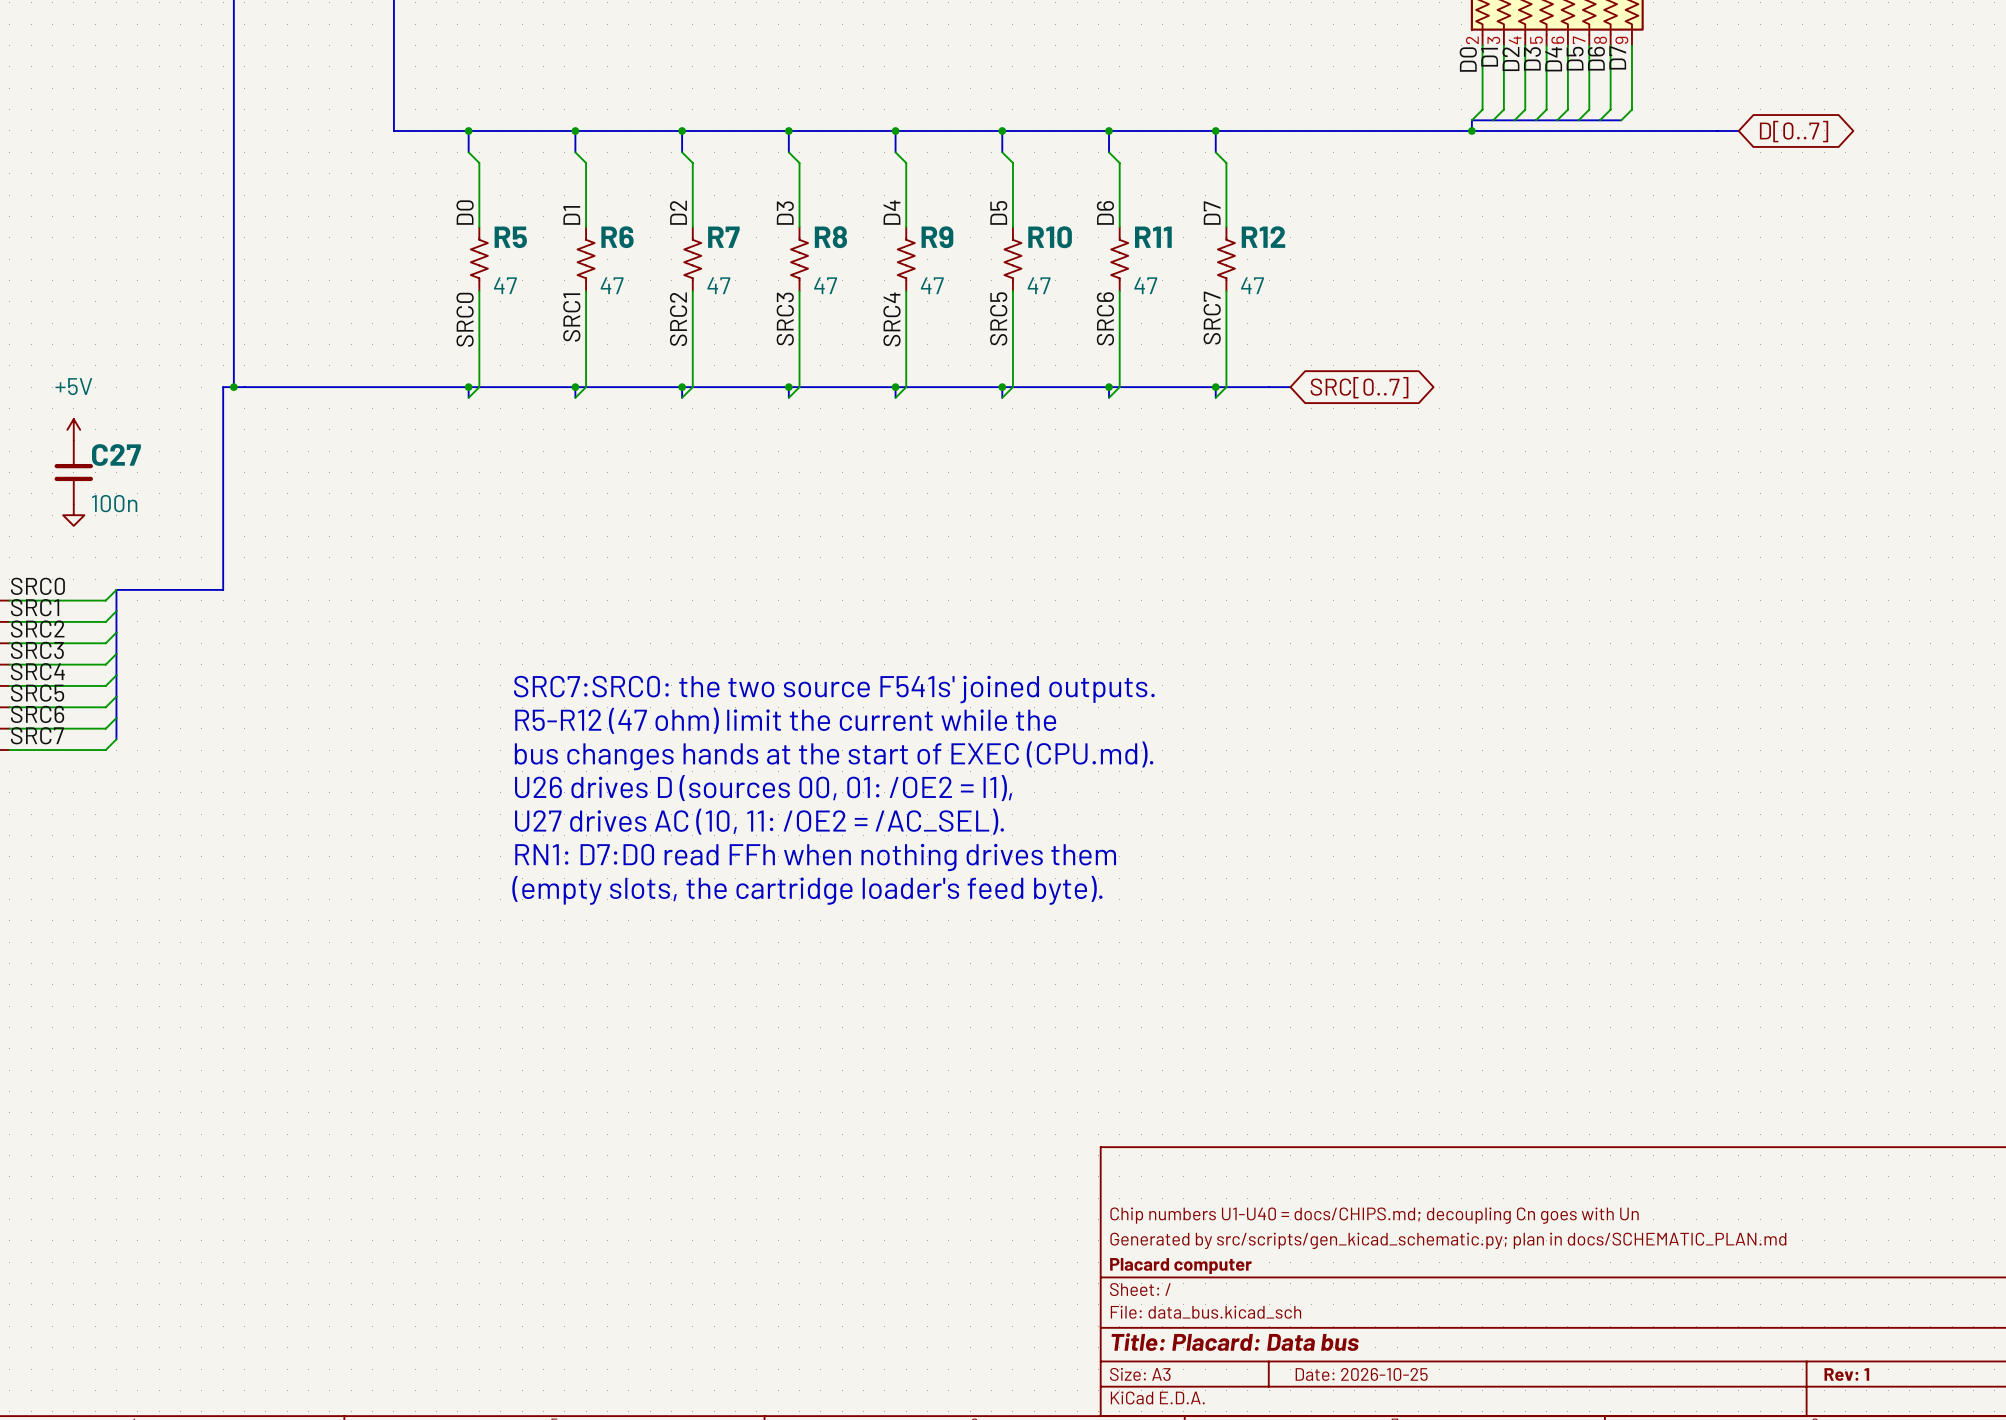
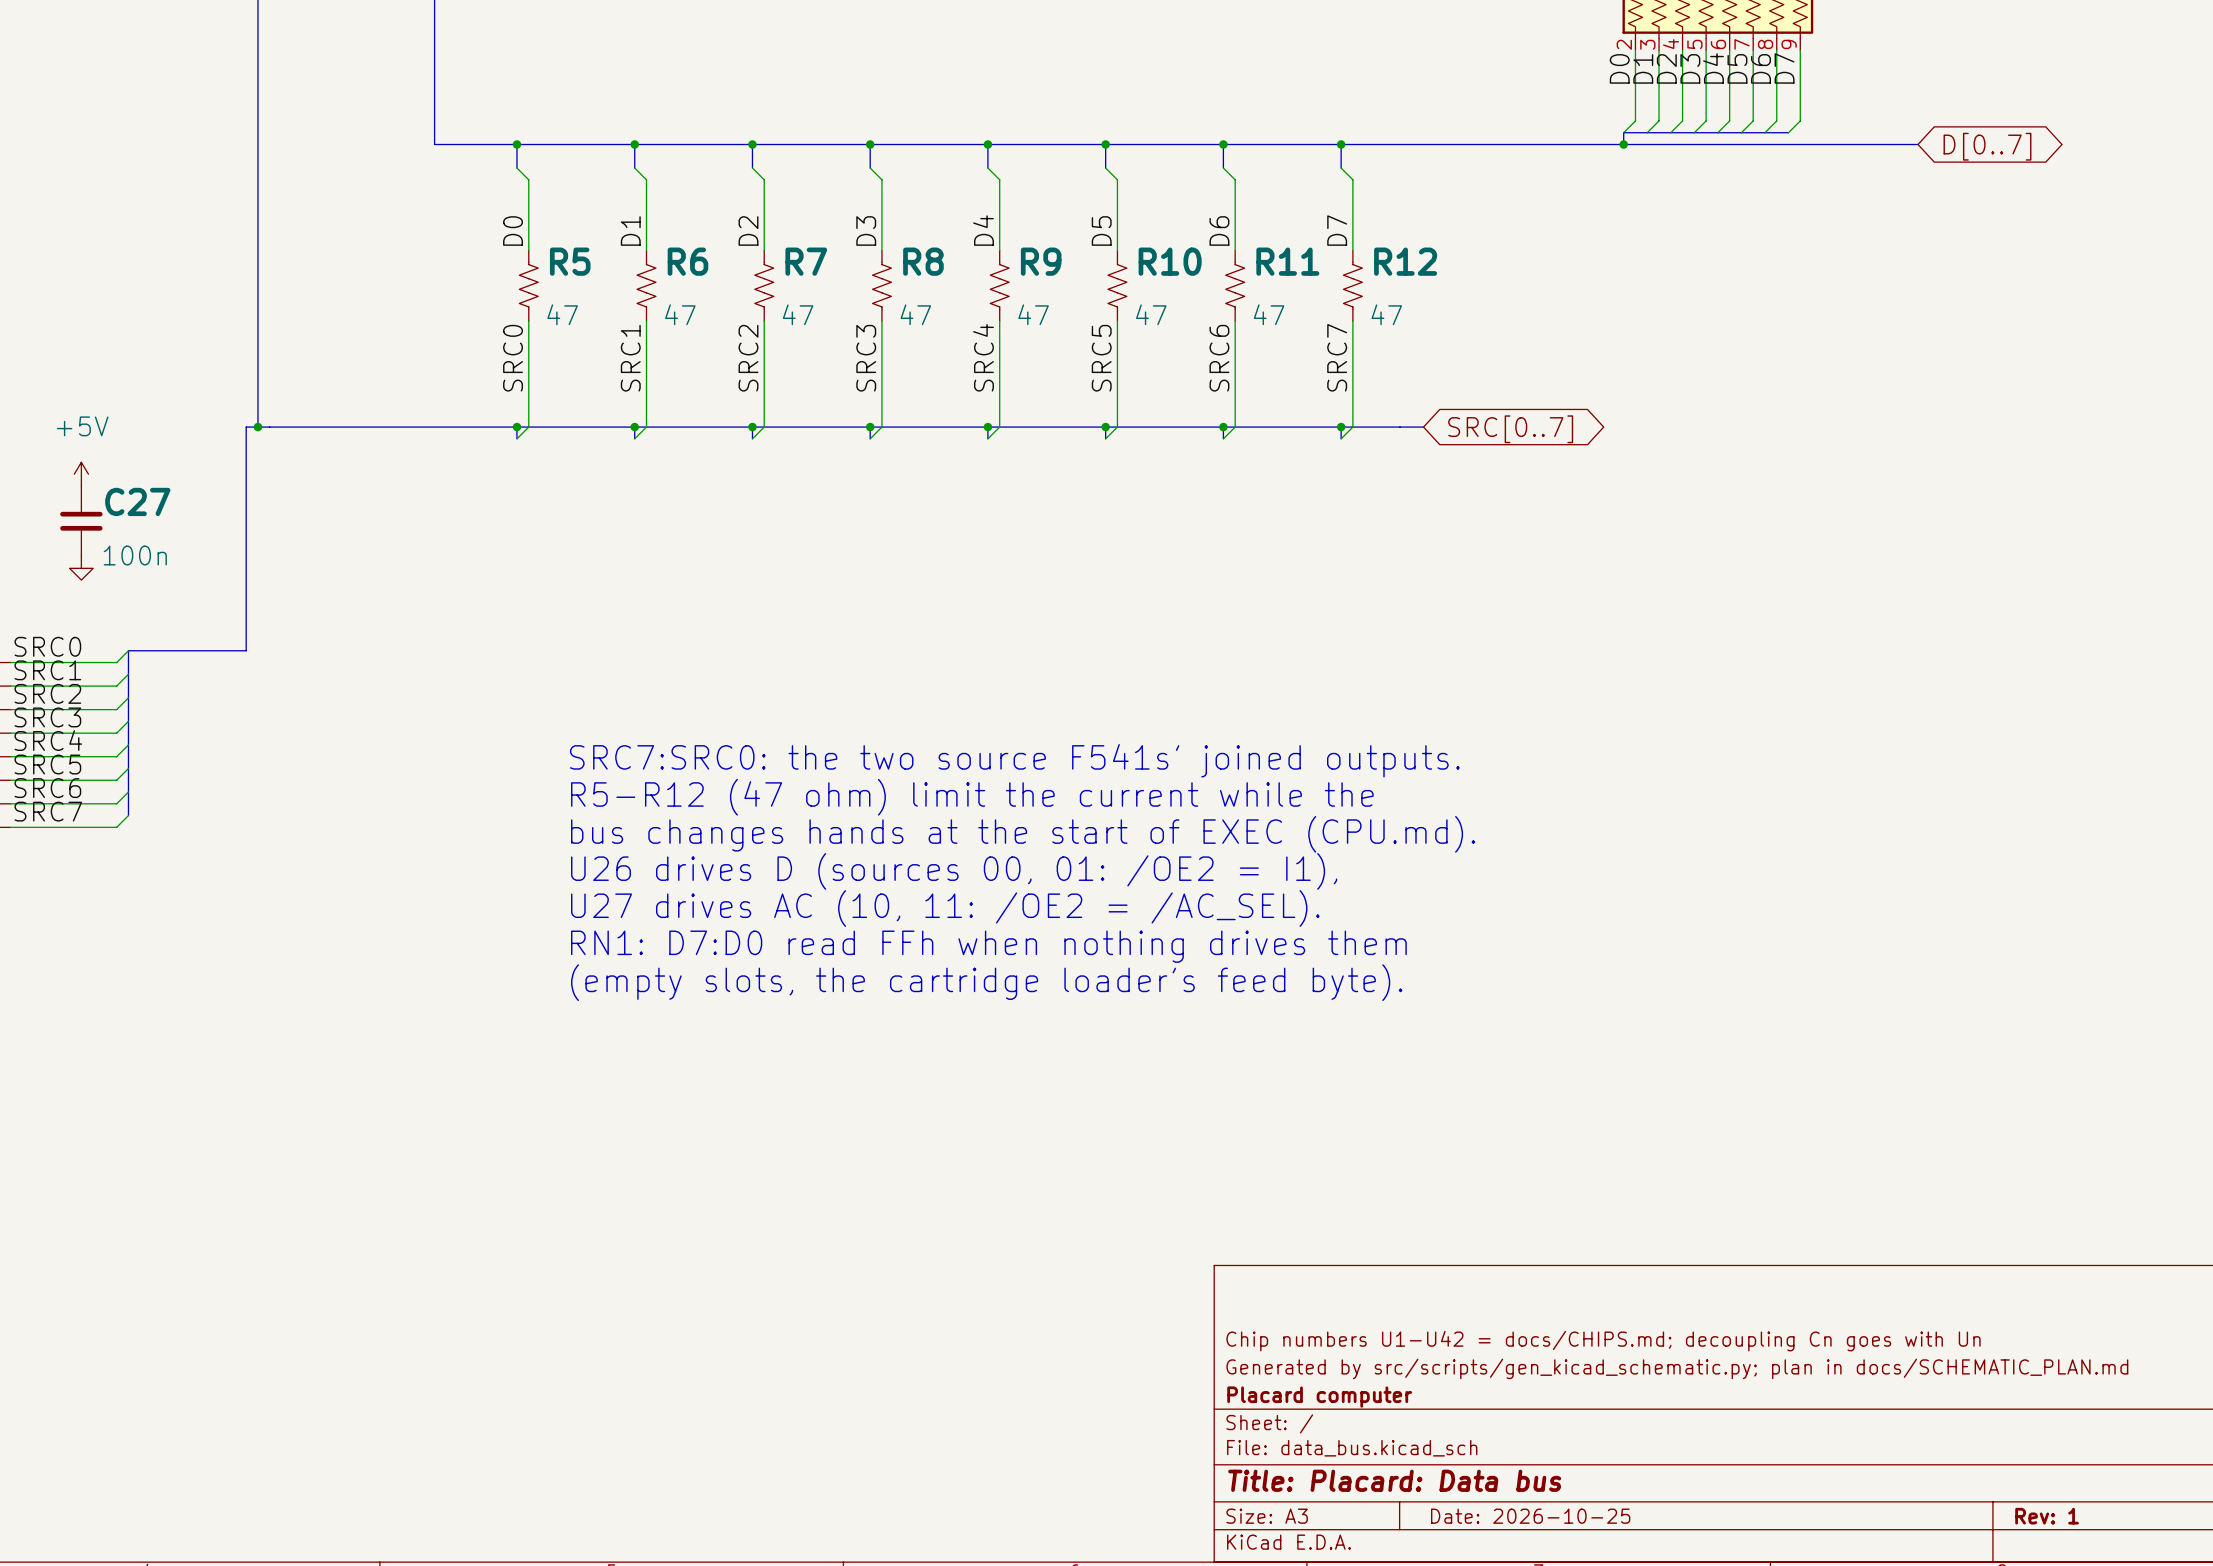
title block: Chip numbers U1-U40 = docs/CHIPS.md; decoupling Cn goes with Un (1374, 1215) -> Chip numbers U1-U42 = docs/CHIPS.md; decoupling Cn goes with Un (1603, 1341)

